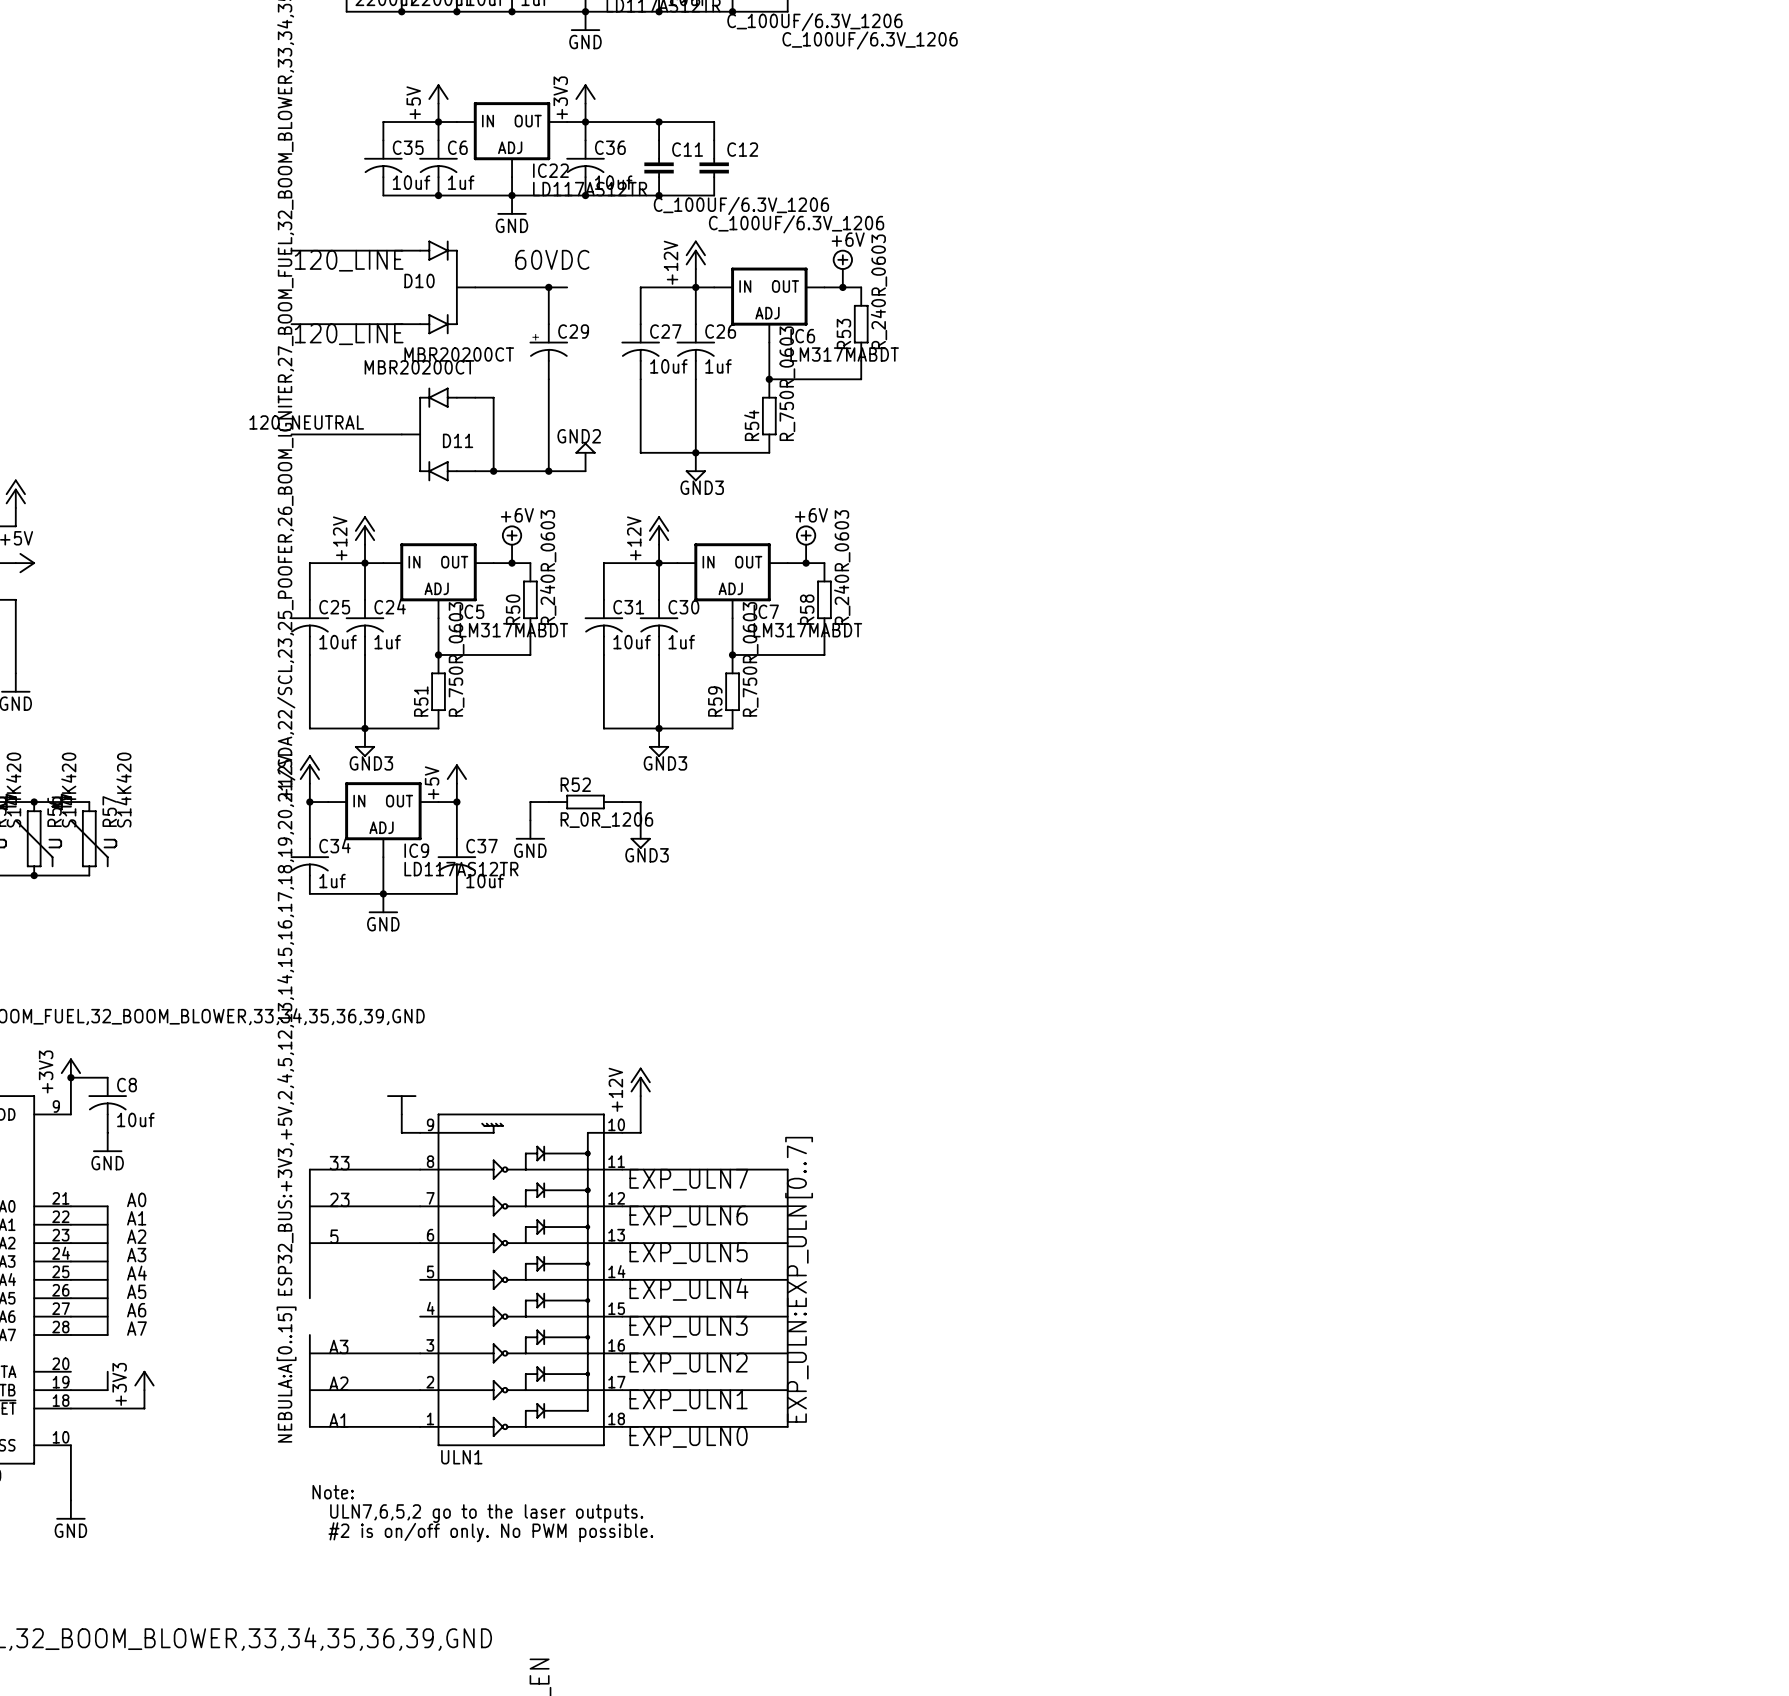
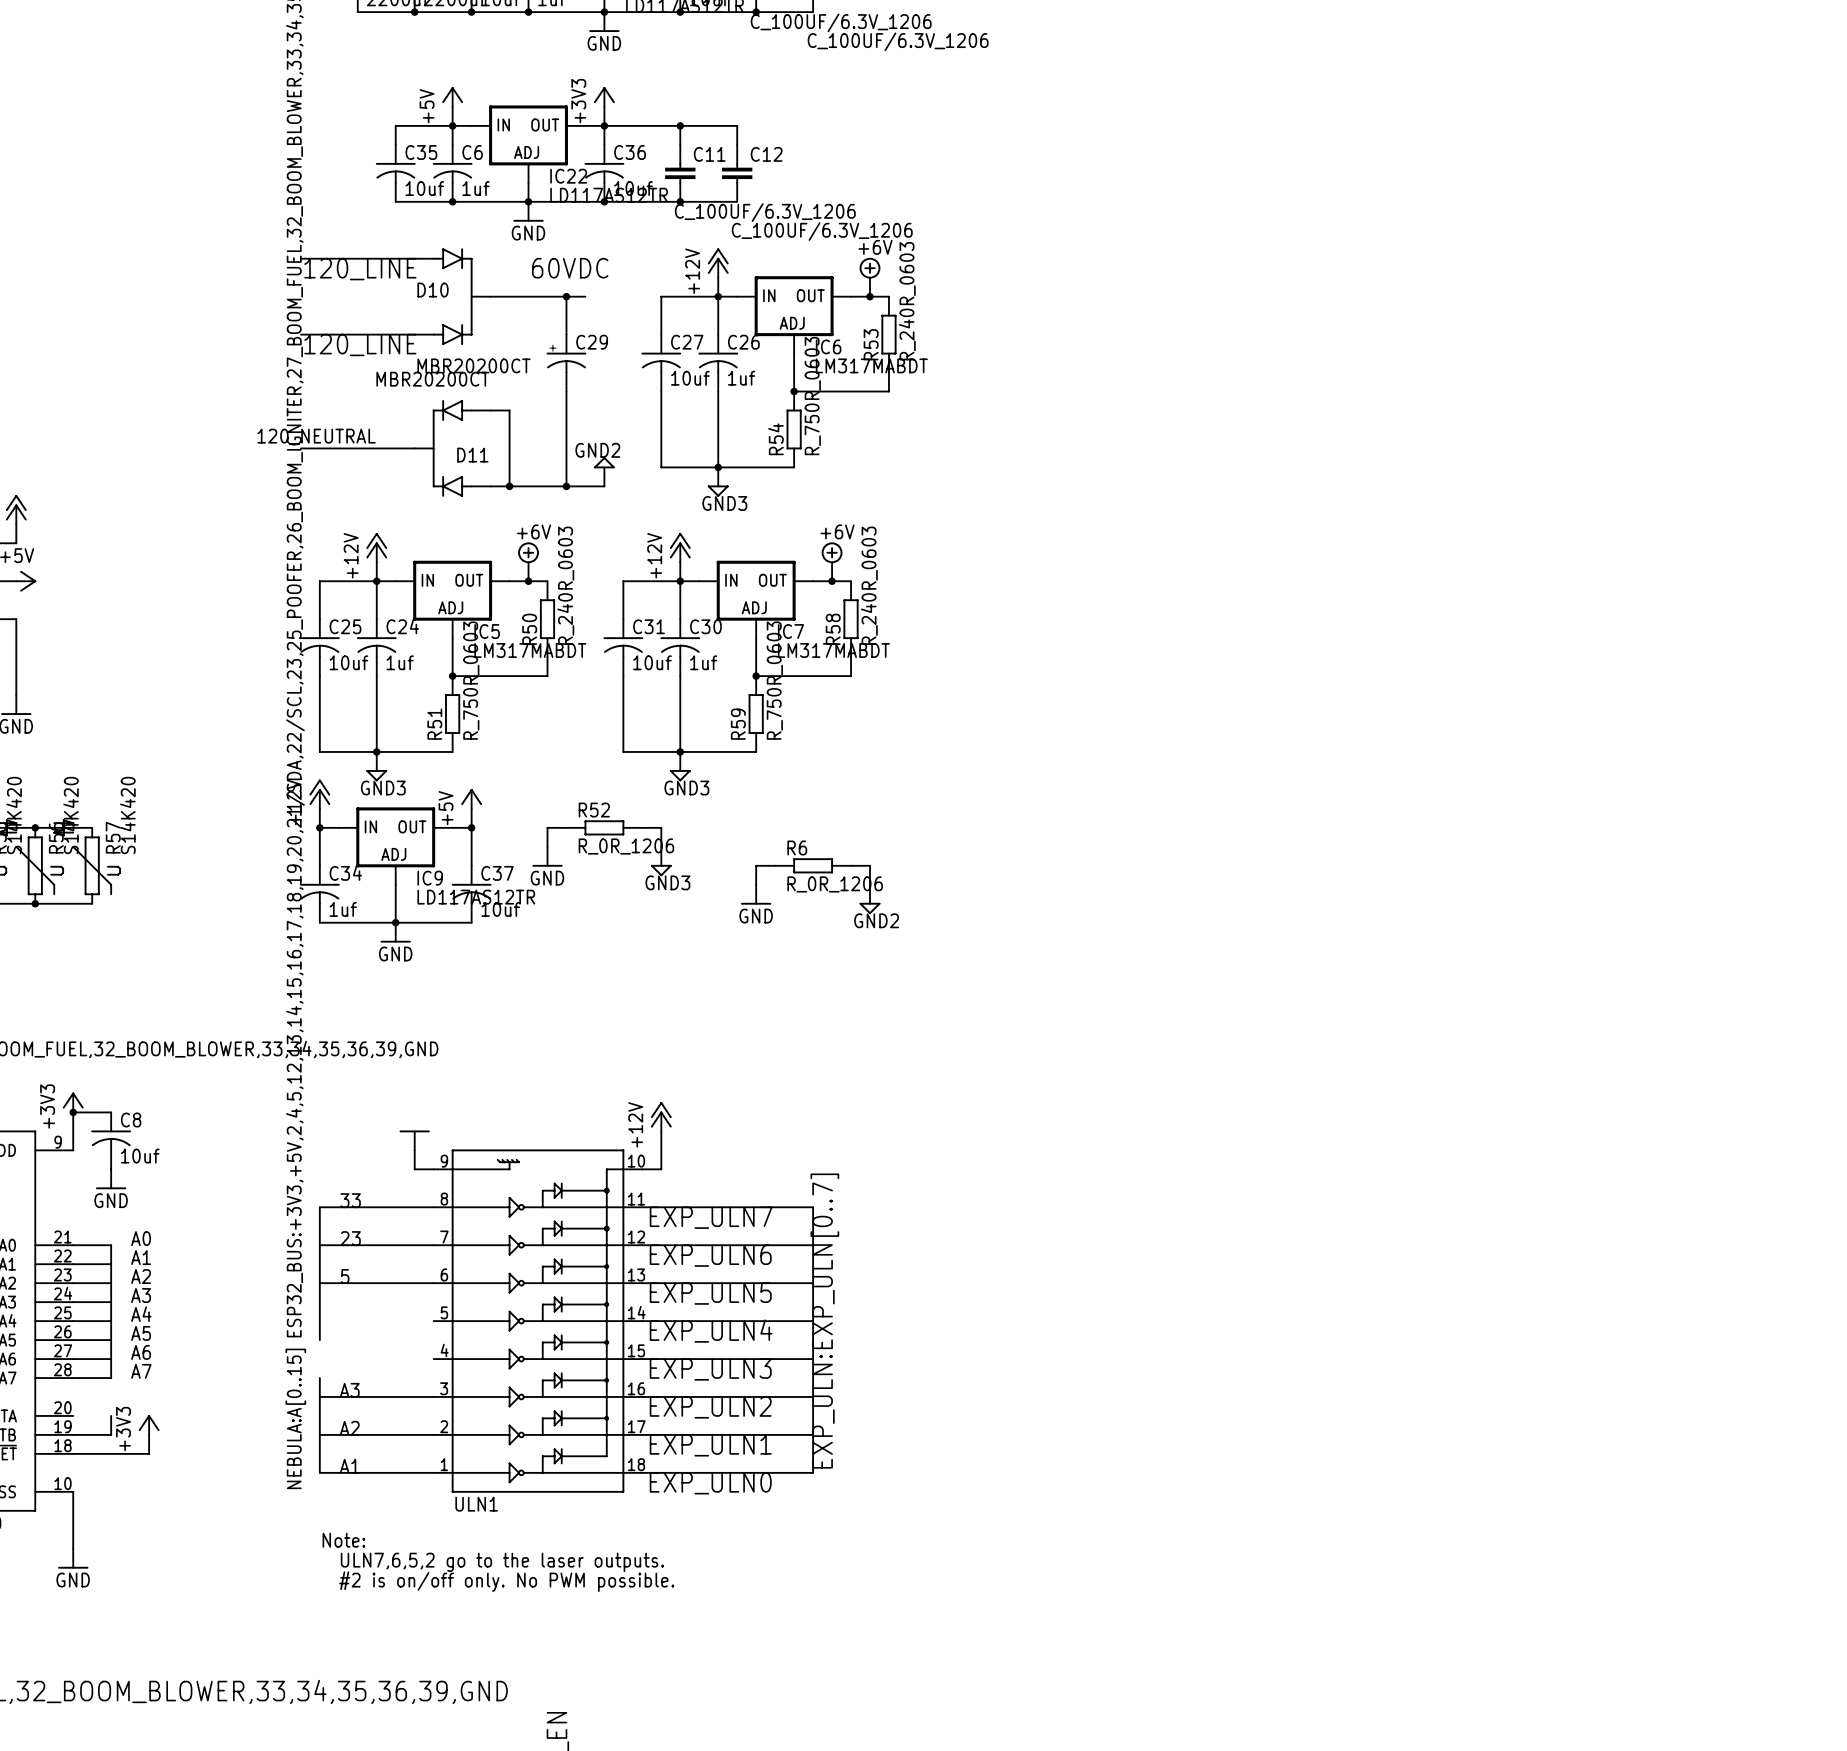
wire: none -> (775, 865) (756, 865) (756, 884)
R6: none -> R_0R_1206 (813, 865)
wire: none -> (851, 865) (870, 865) (870, 884)
power symbol: none -> GND (756, 894)
power symbol: none -> GND2 (870, 899)

